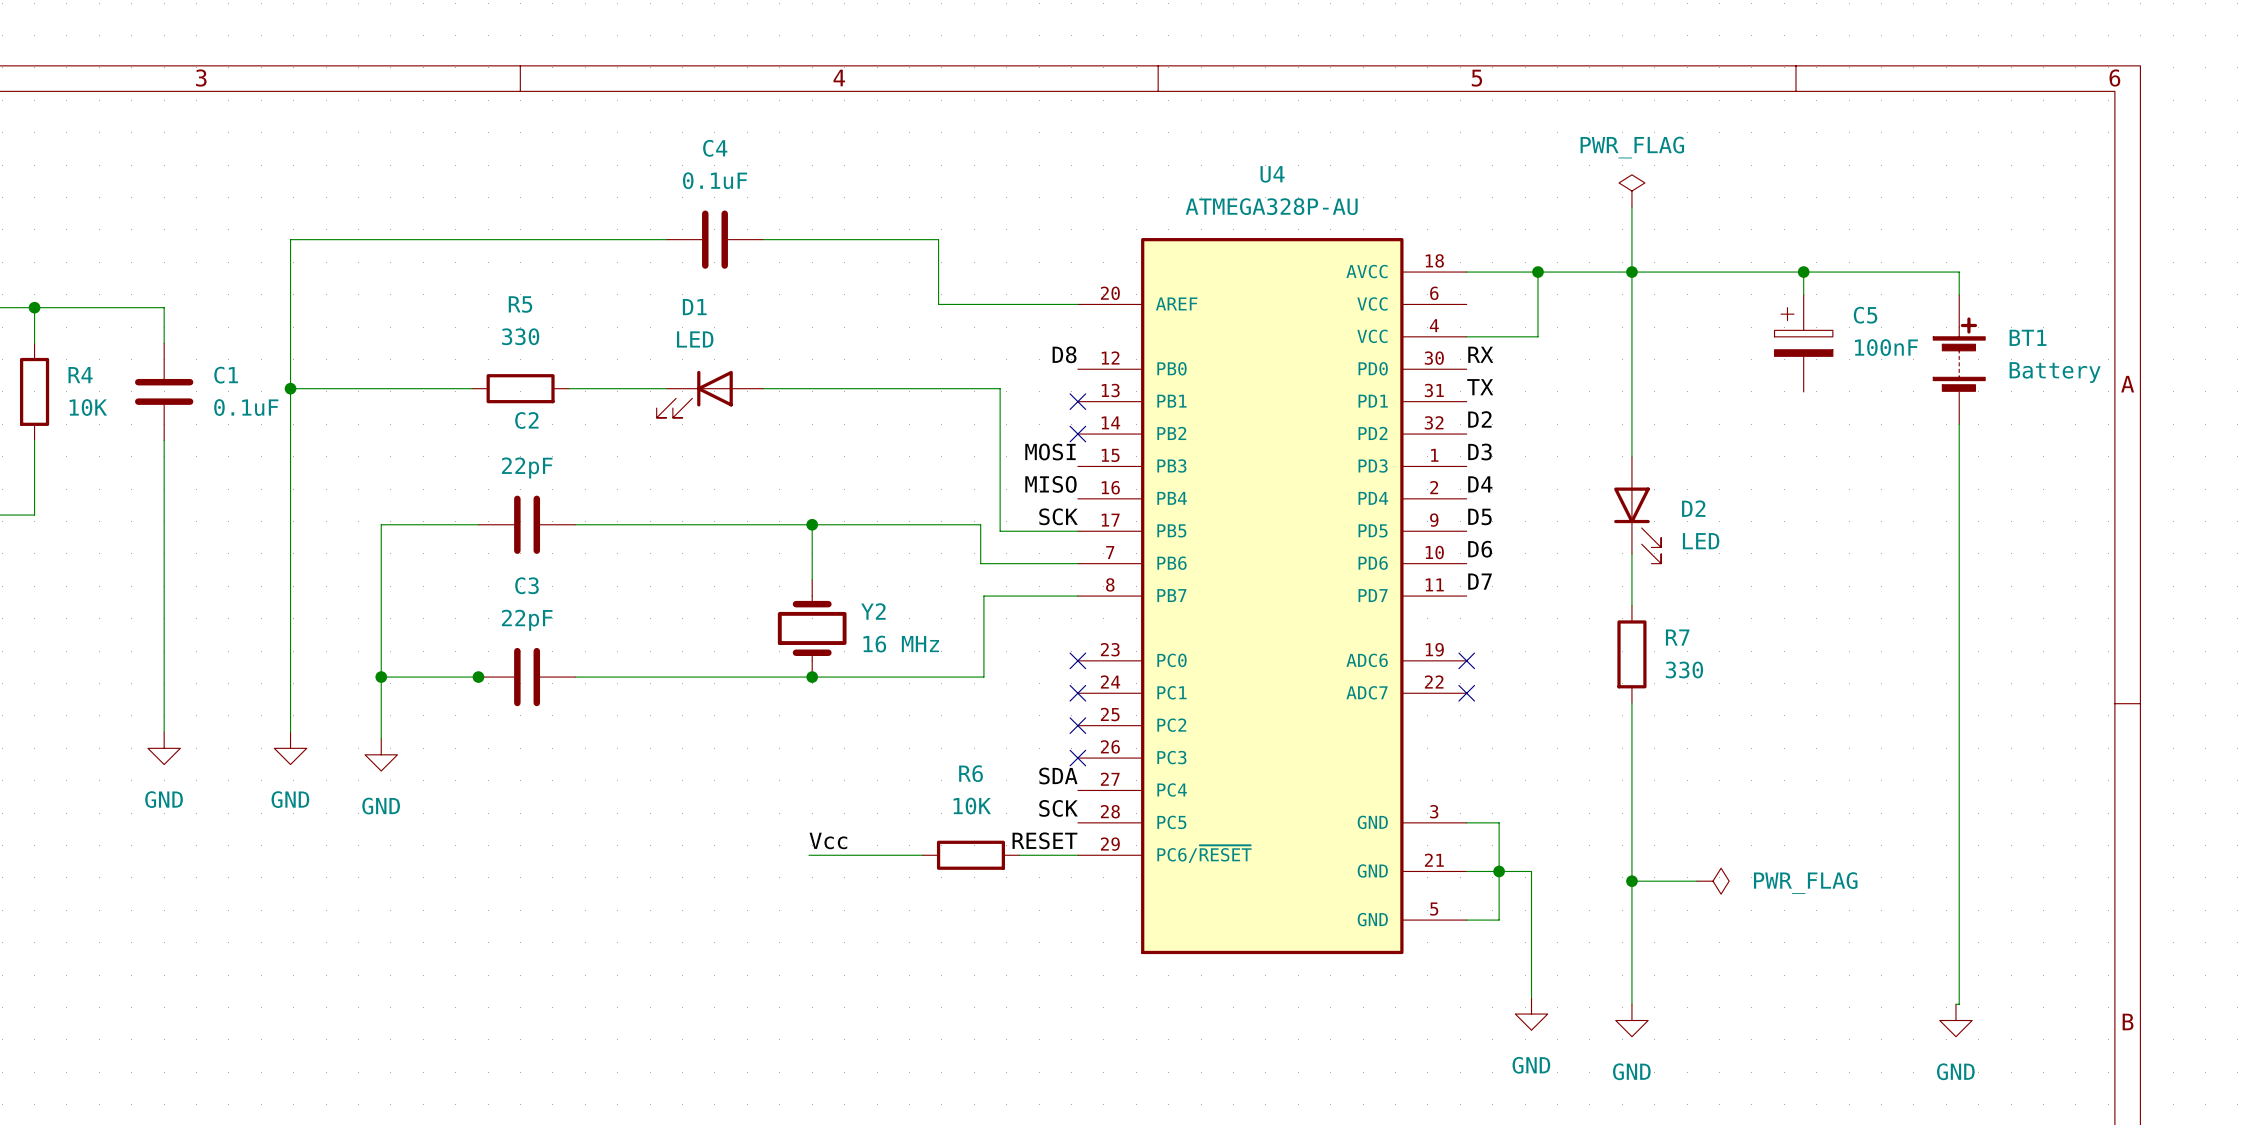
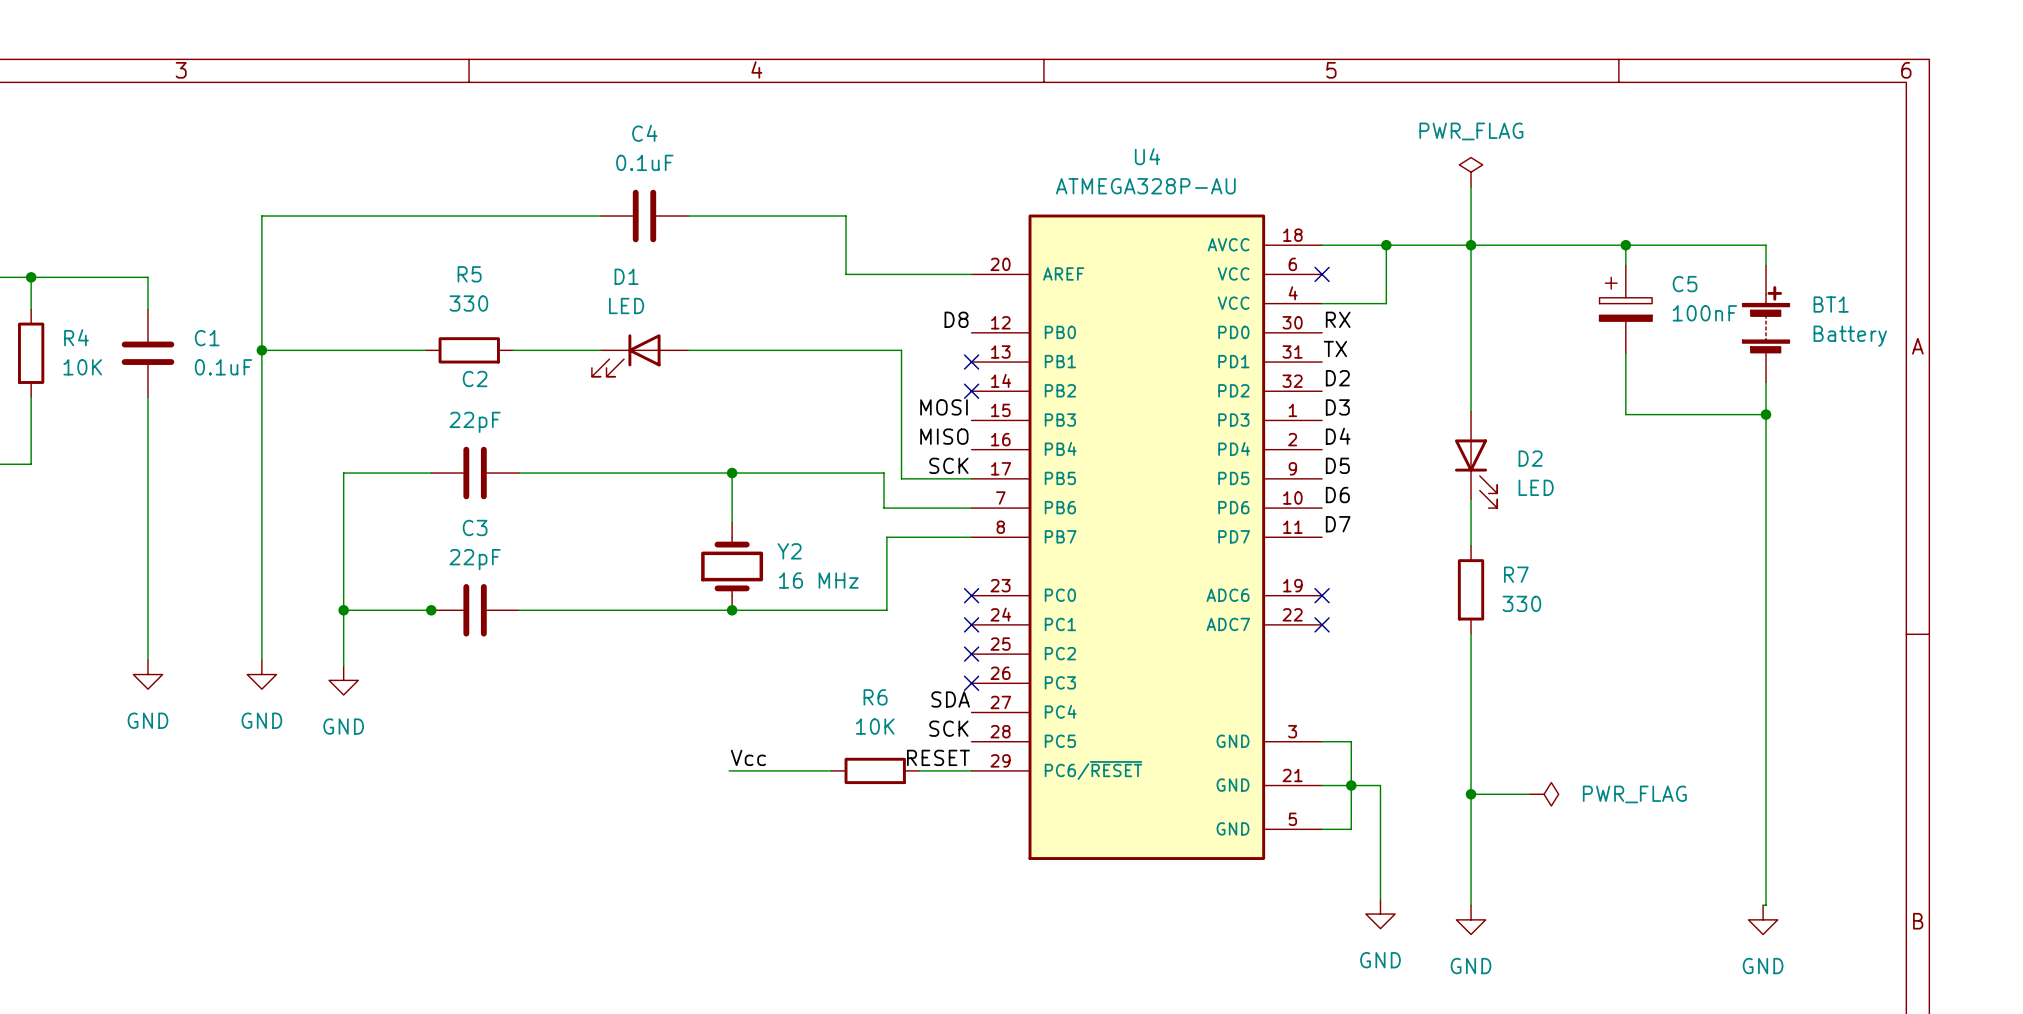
no-connect mark: none -> (1322, 274)
wire: none -> (1625, 353) (1625, 414) (1766, 414)
junction: none -> (1766, 414)

